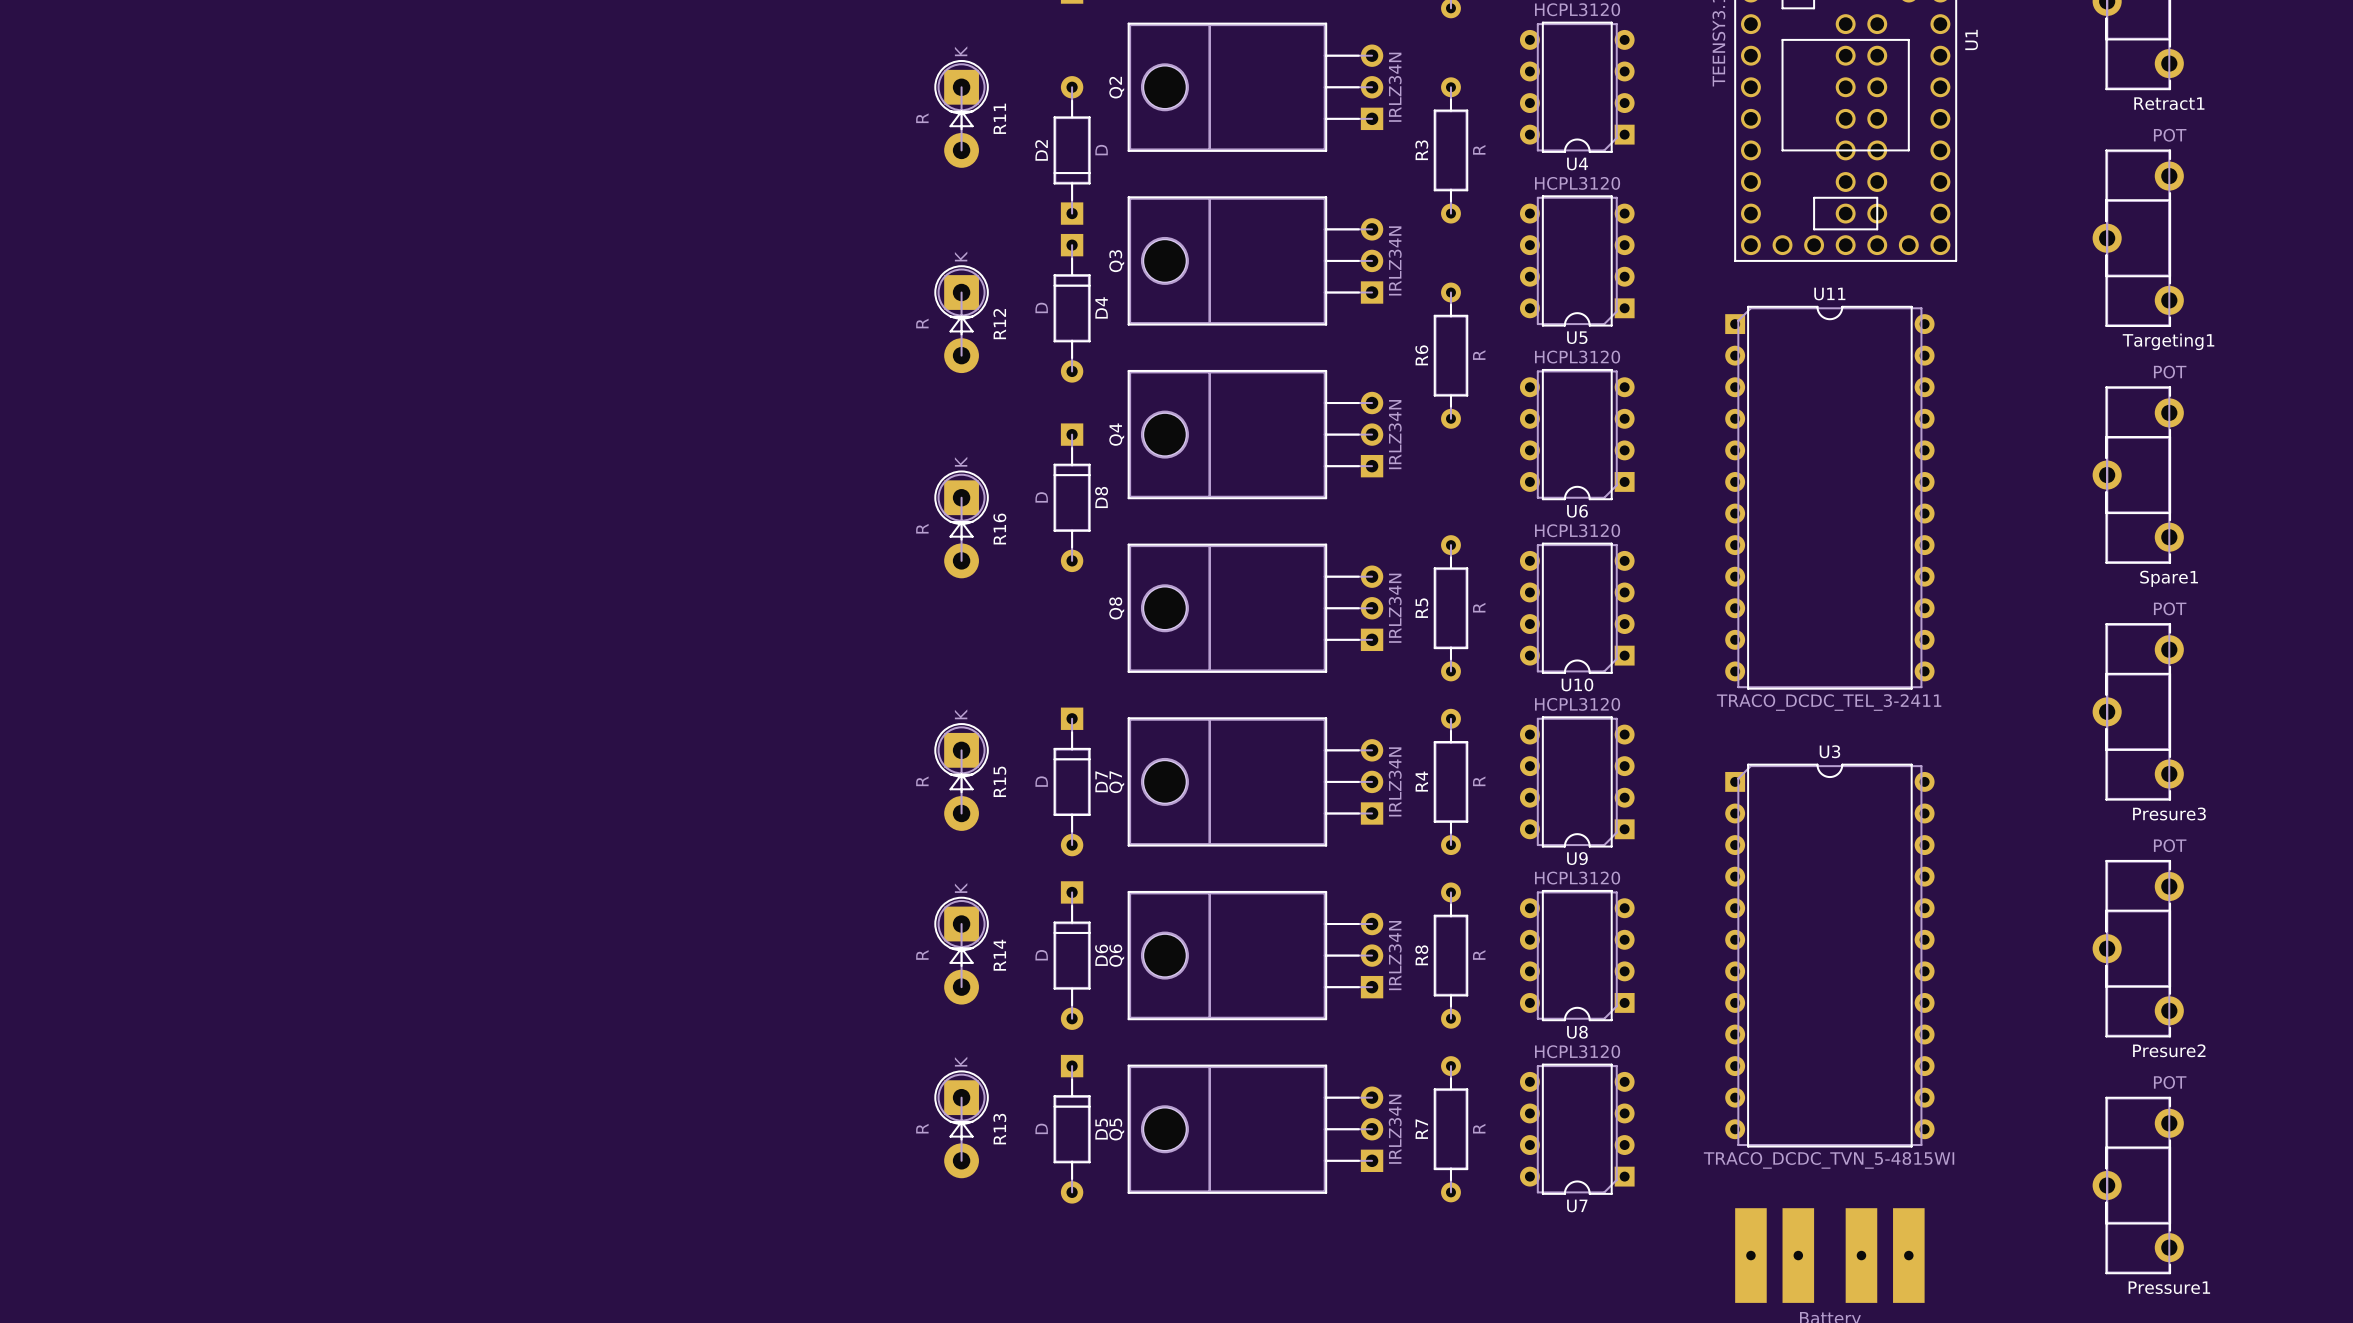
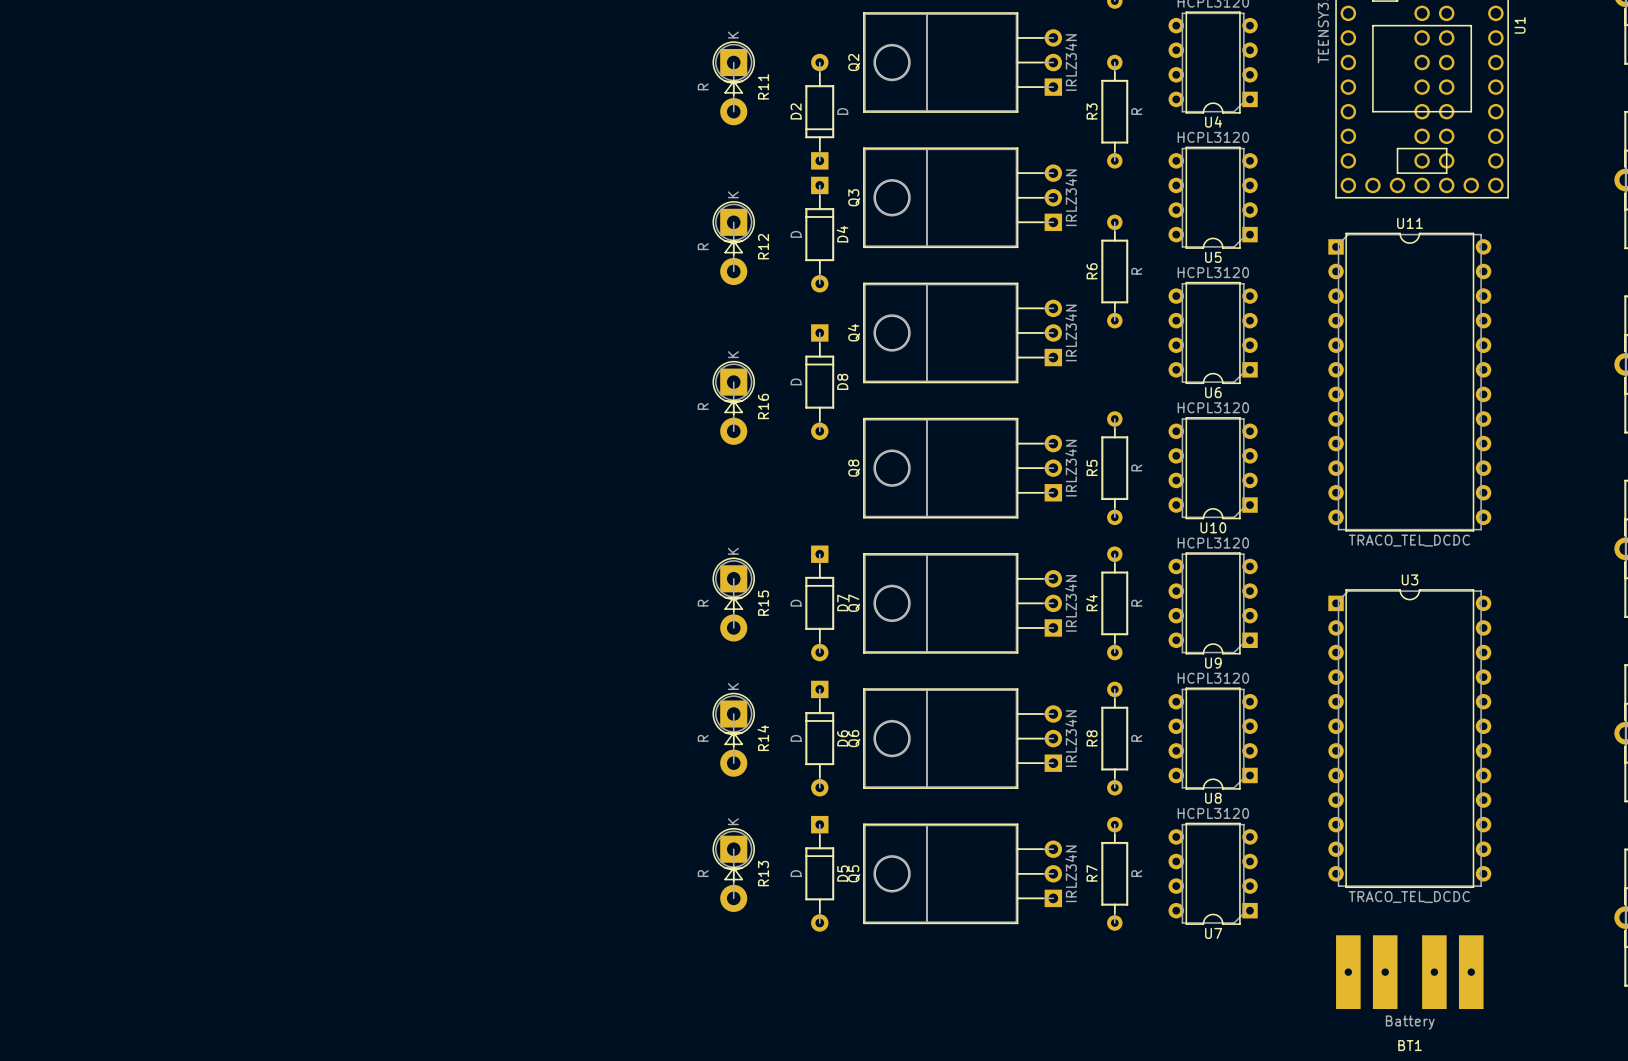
U11 value: TRACO_DCDC_TEL_3-2411 (1829, 702) -> TRACO_TEL_DCDC (1409, 540)
U3 value: TRACO_DCDC_TVN_5-4815WI (1829, 1160) -> TRACO_TEL_DCDC (1409, 897)

